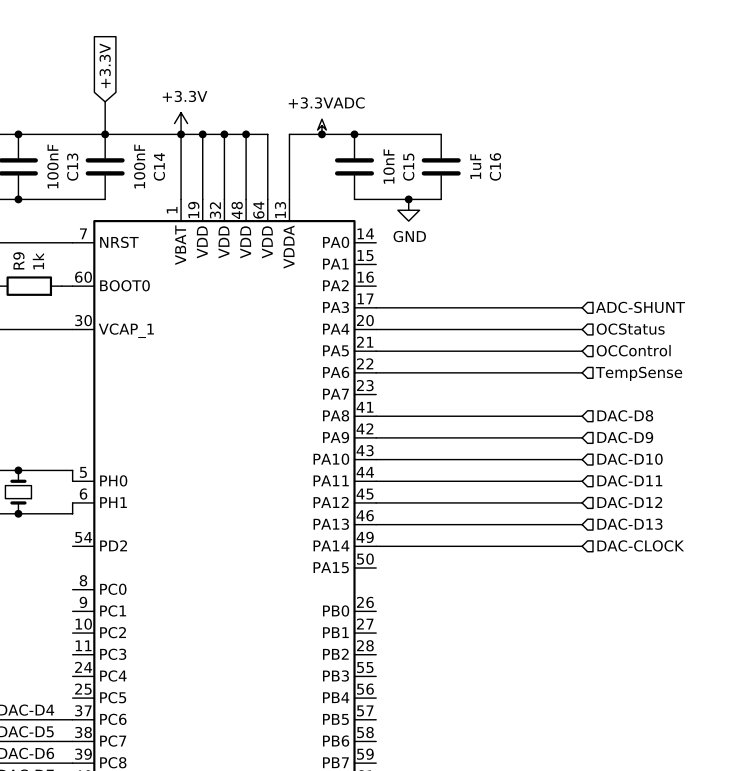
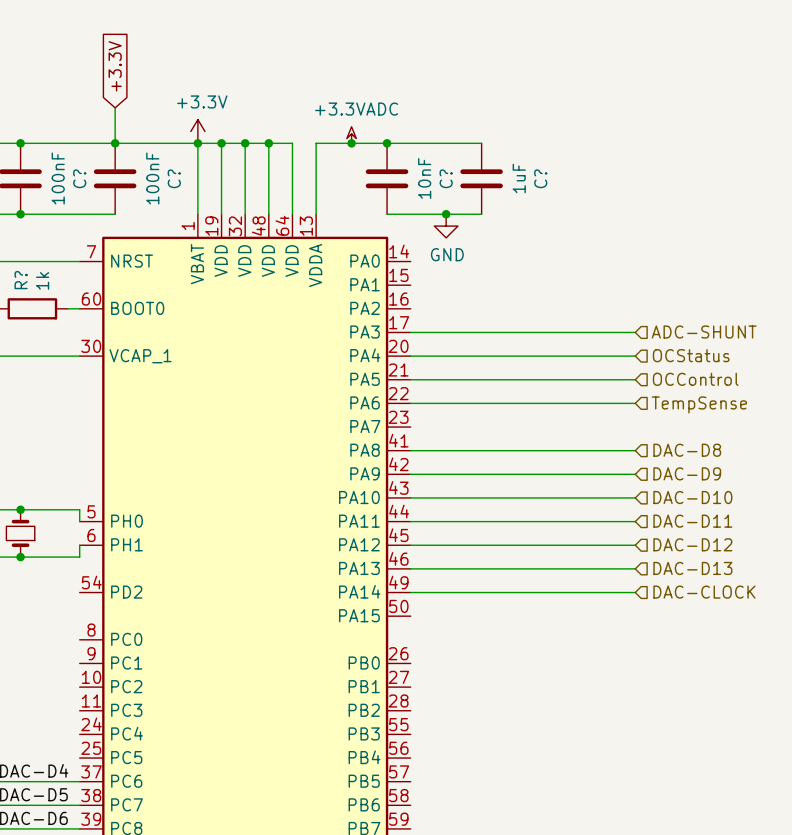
C14 name: C14 (159, 166) -> C? (174, 178)
C16 name: C16 (495, 166) -> C? (540, 178)
C13 name: C13 (72, 167) -> C? (79, 178)
C15 name: C15 (408, 167) -> C? (446, 178)
R9 name: R9 (18, 260) -> R? (21, 280)

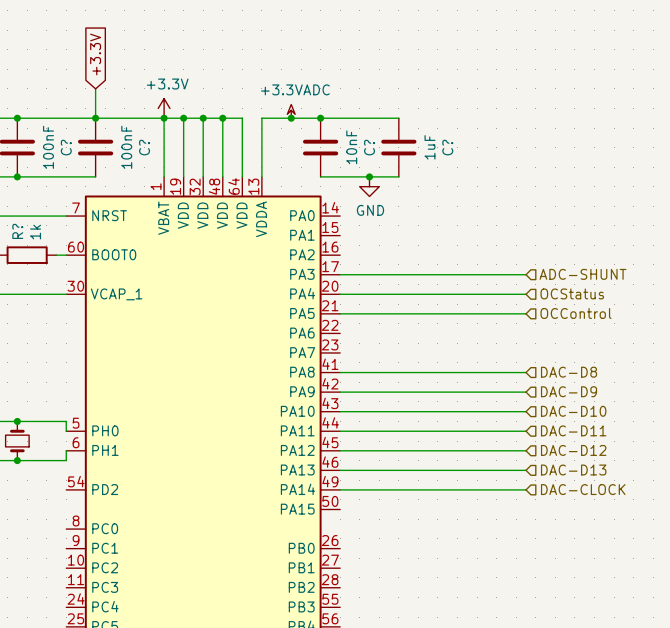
wire: (410, 403) (635, 403) -> none
hierarchical label: TempSense (699, 404) -> none

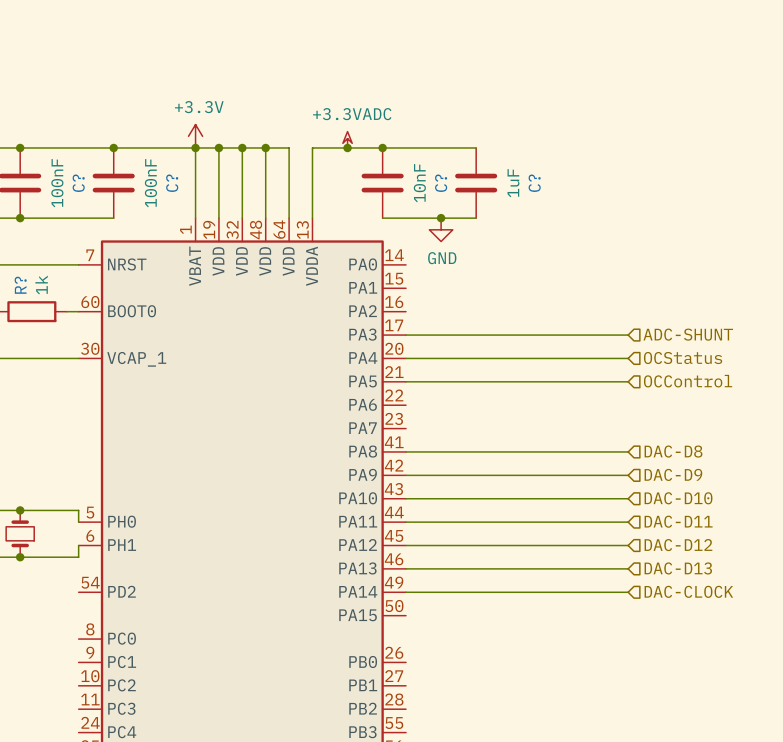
global label: +3.3V (95, 54) -> none
wire: (95, 88) (95, 118) -> none

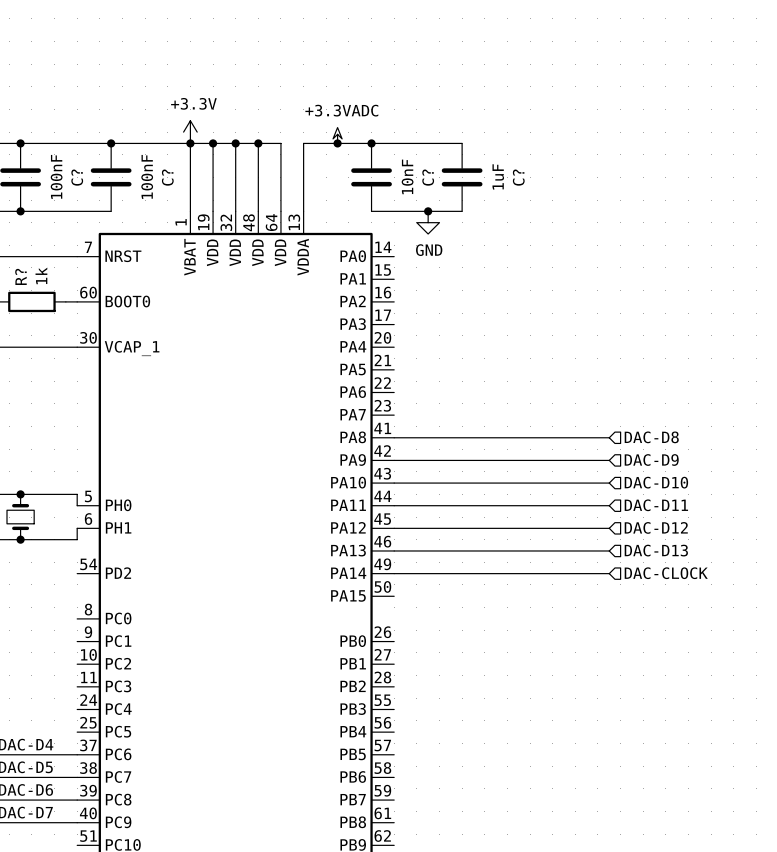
hierarchical label: ADC-SHUNT (688, 334) -> none
wire: (406, 335) (628, 335) -> none
wire: (406, 358) (628, 358) -> none
hierarchical label: OCStatus (683, 358) -> none
wire: (406, 381) (628, 381) -> none
hierarchical label: OCControl (688, 381) -> none

